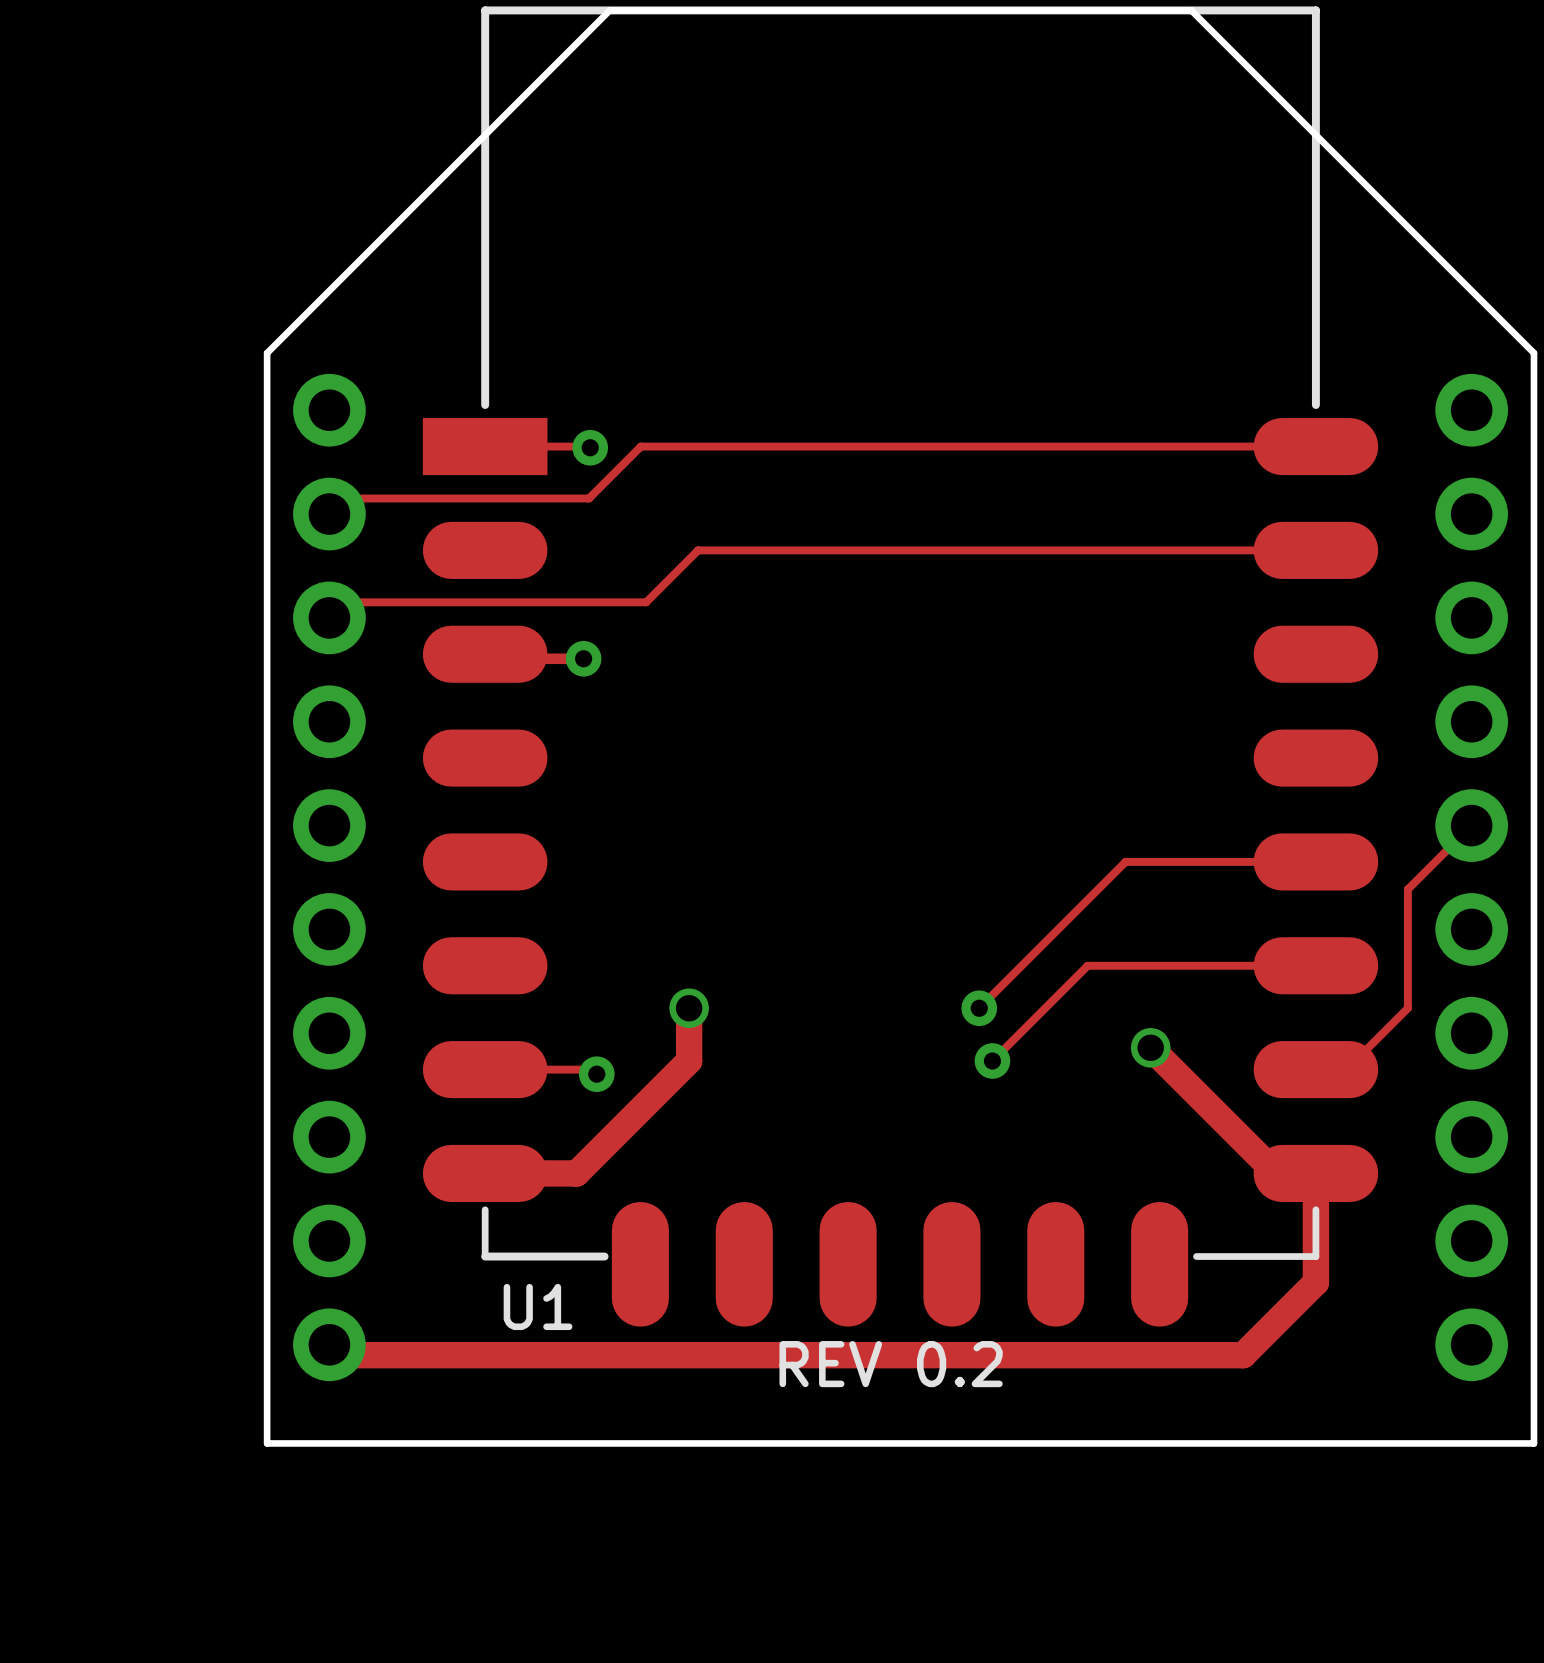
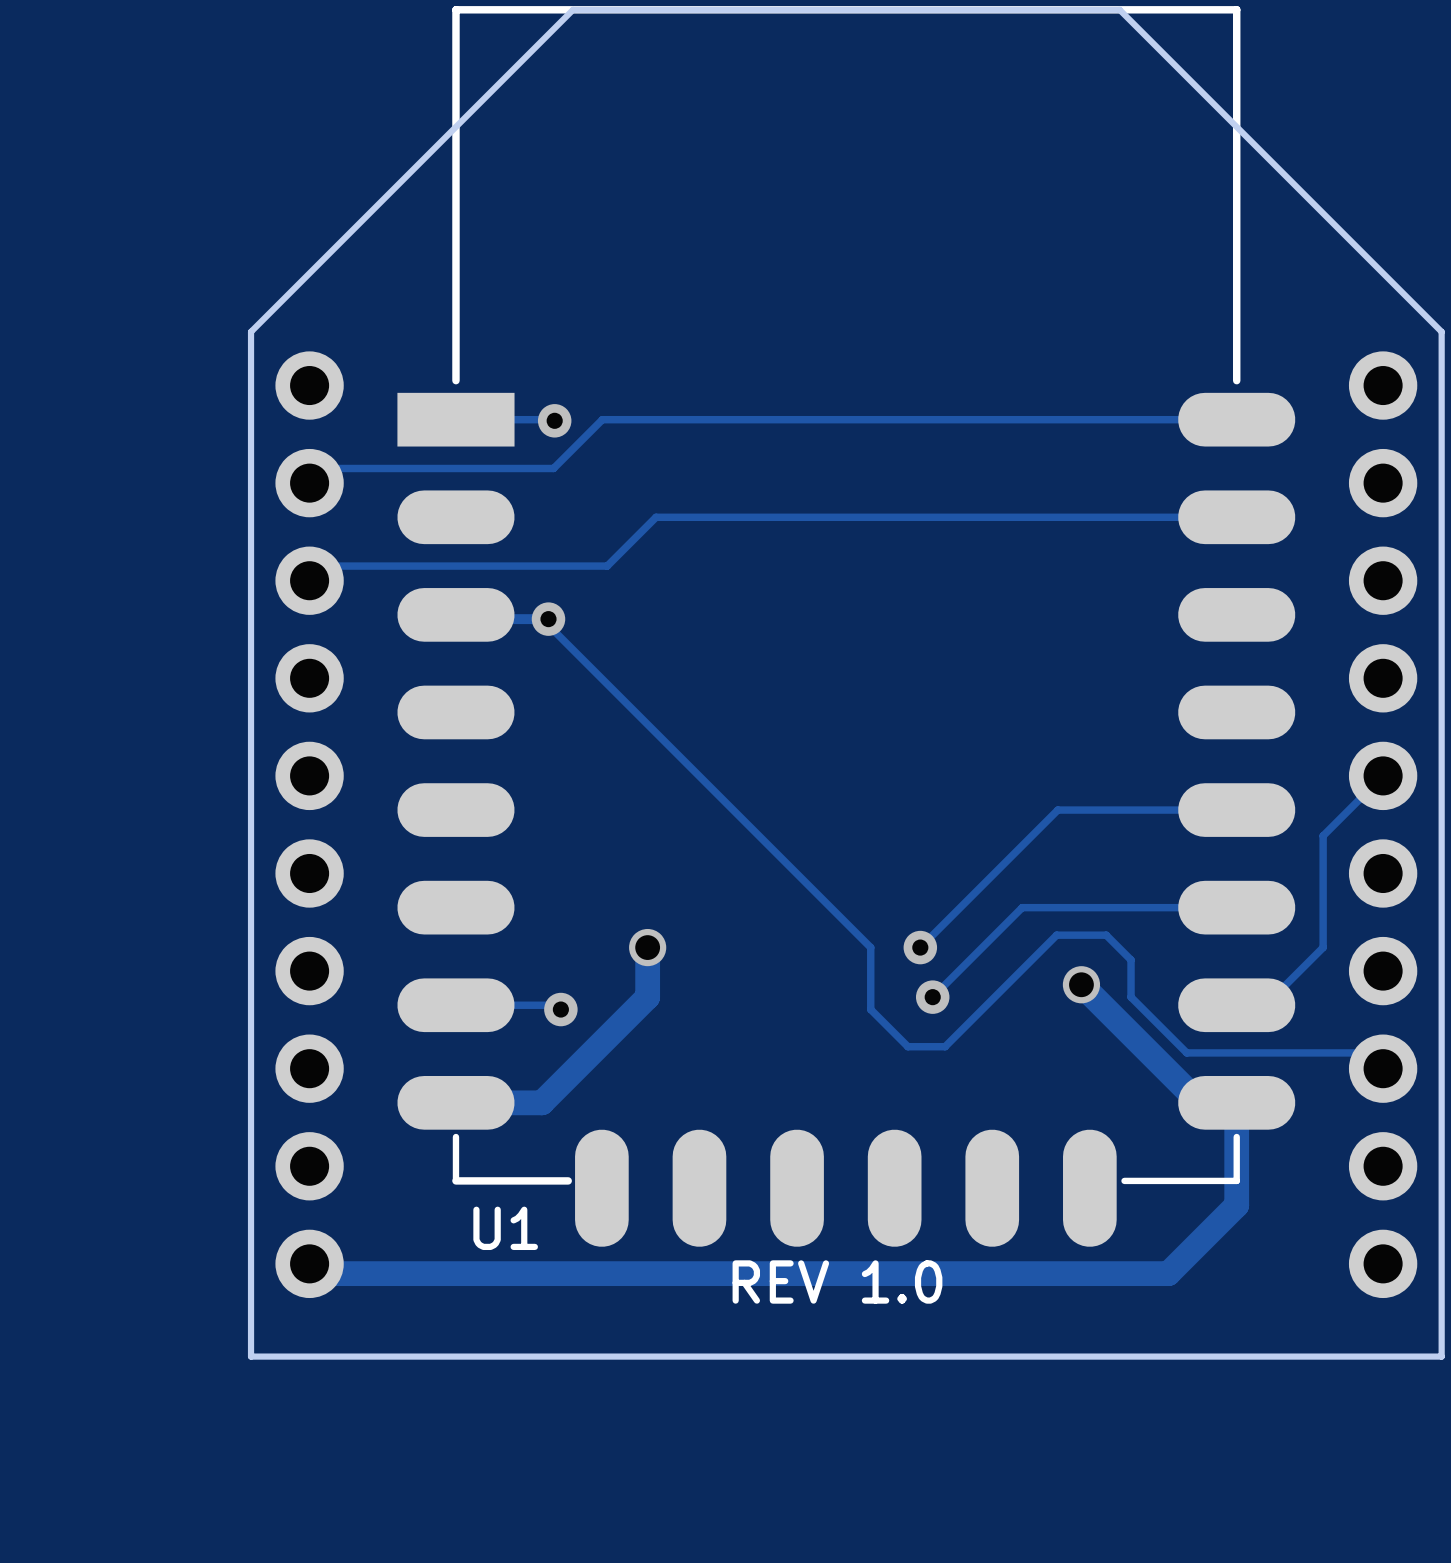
track: none -> (548, 619) (548, 625) (870, 947) (870, 1009) (907, 1046) (945, 1046) (1056, 935) (1106, 935) (1131, 959) (1131, 997) (1186, 1052) (1367, 1052) (1383, 1068)
text: REV 0.2 (891, 1364) -> REV 1.0 (837, 1281)

